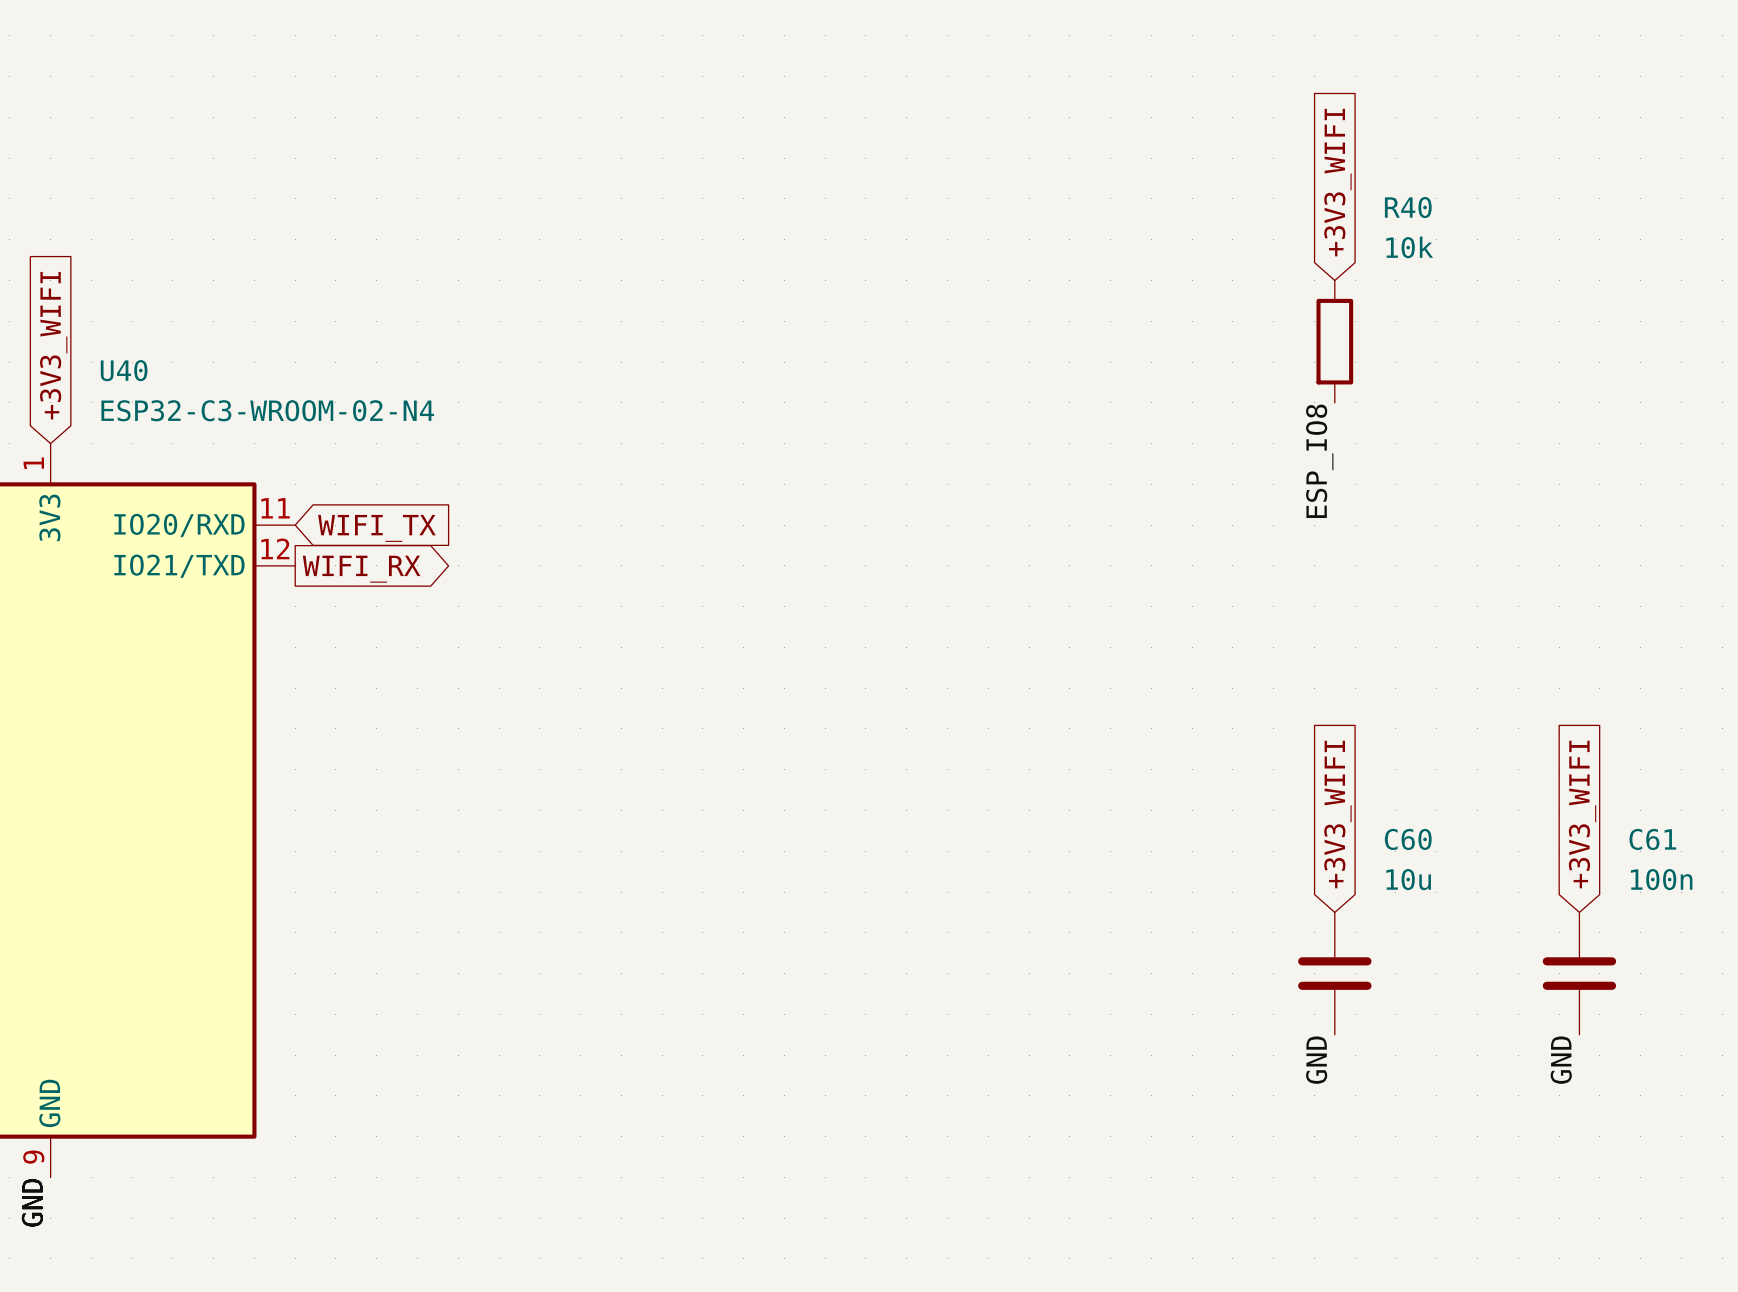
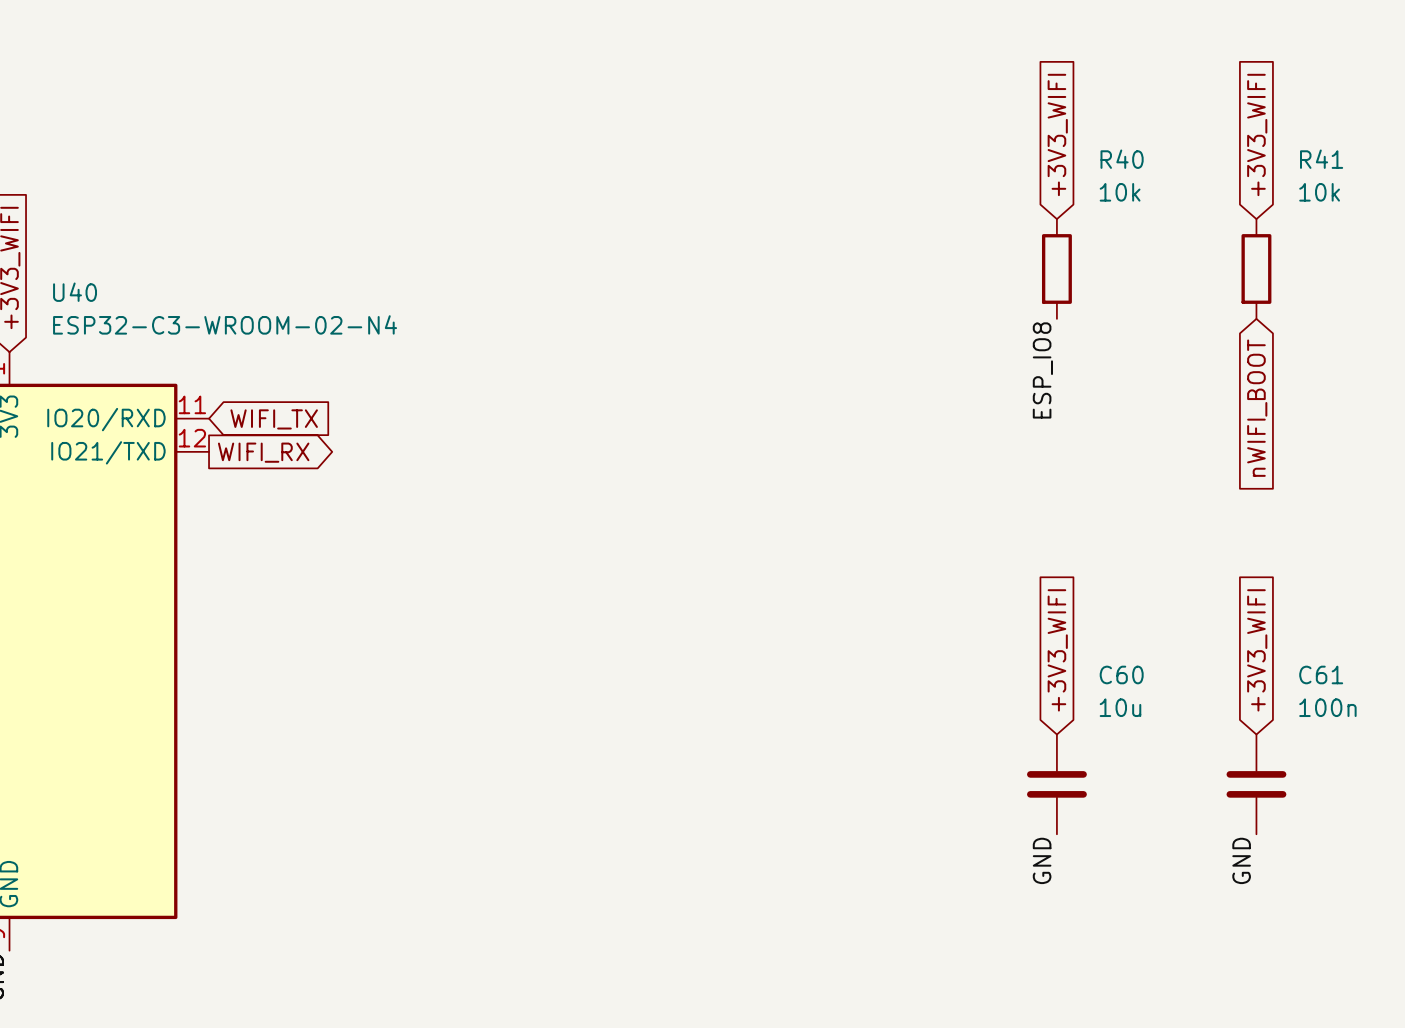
global label: none -> +3V3_WIFI (1257, 134)
R41: none -> 10k (1256, 268)
global label: none -> nWIFI_BOOT (1257, 408)

